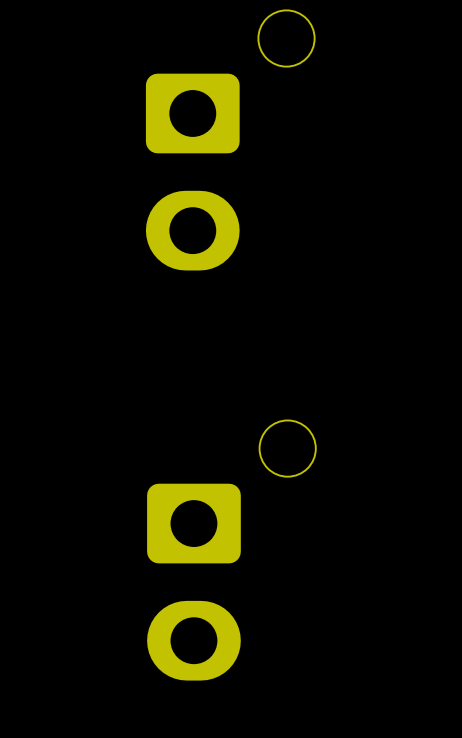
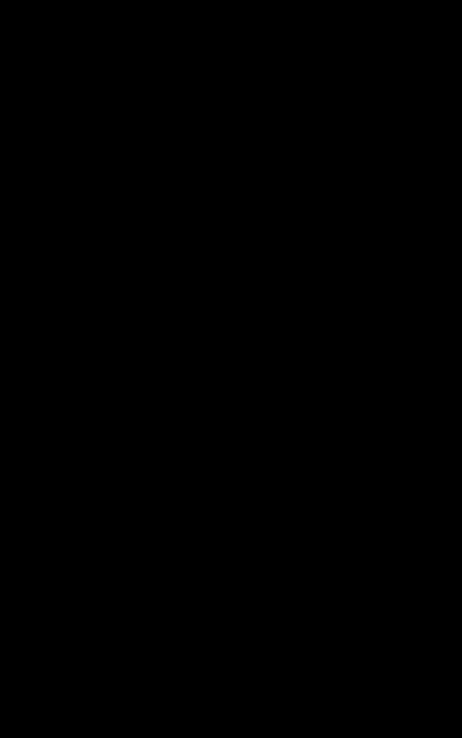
part: (230, 140) -> none
part: (231, 550) -> none

